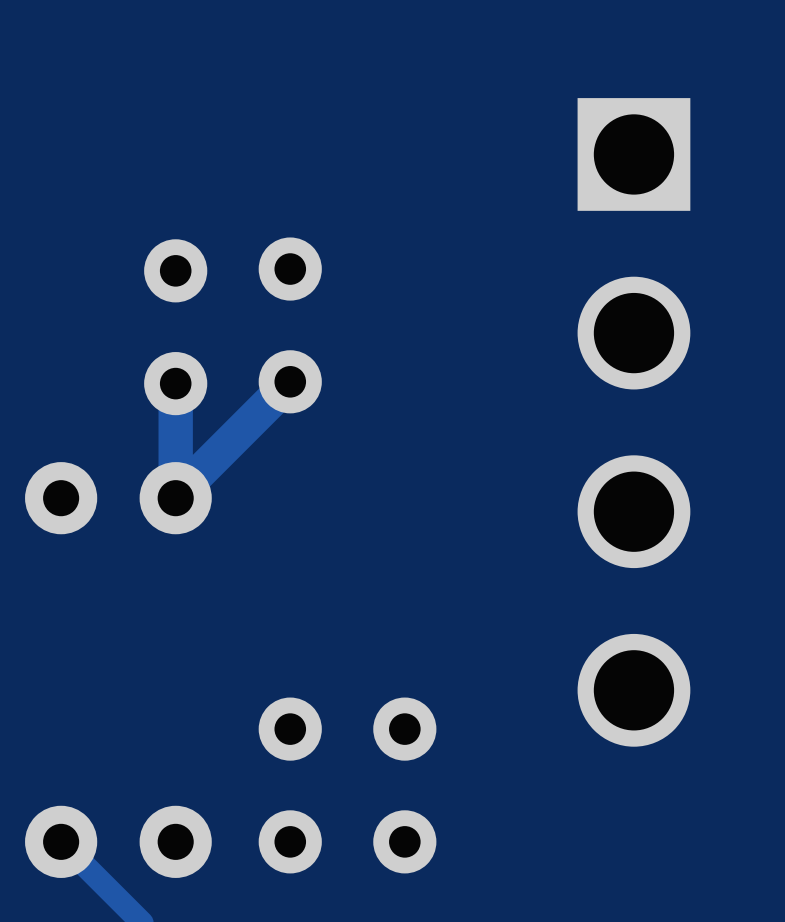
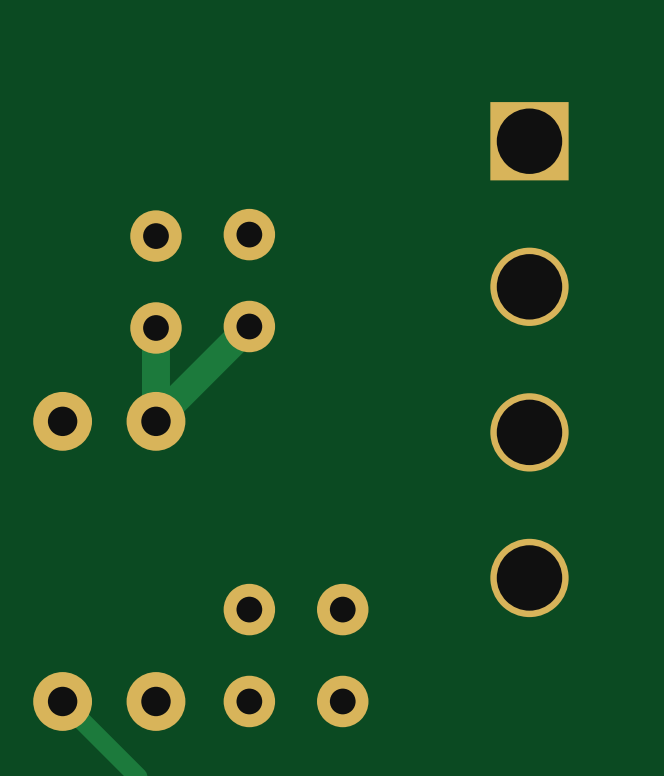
part footprint: [577, 98, 691, 747] -> [490, 102, 569, 618]

